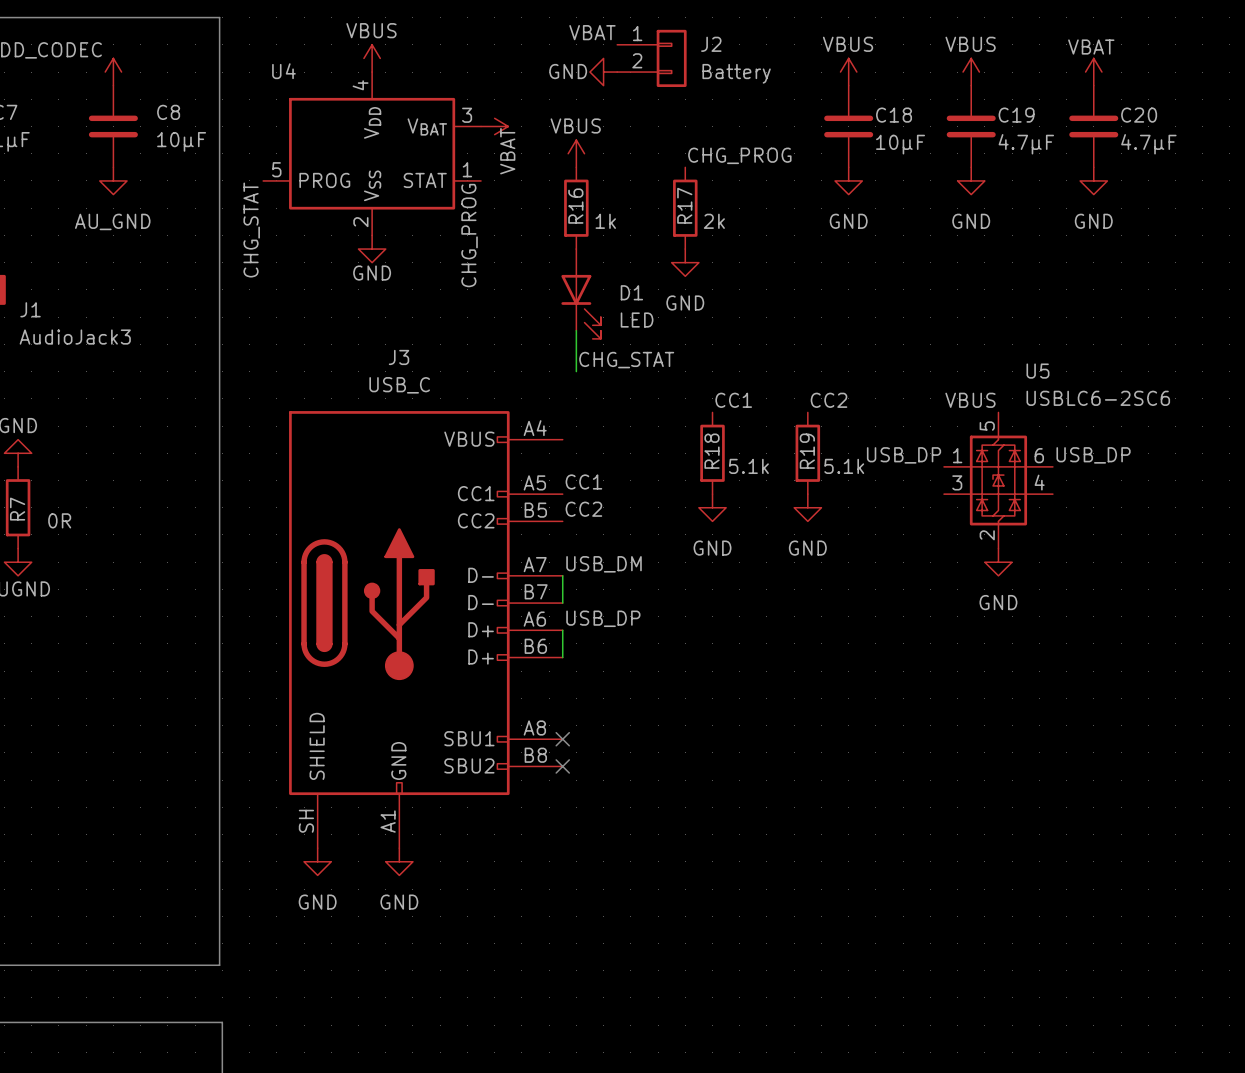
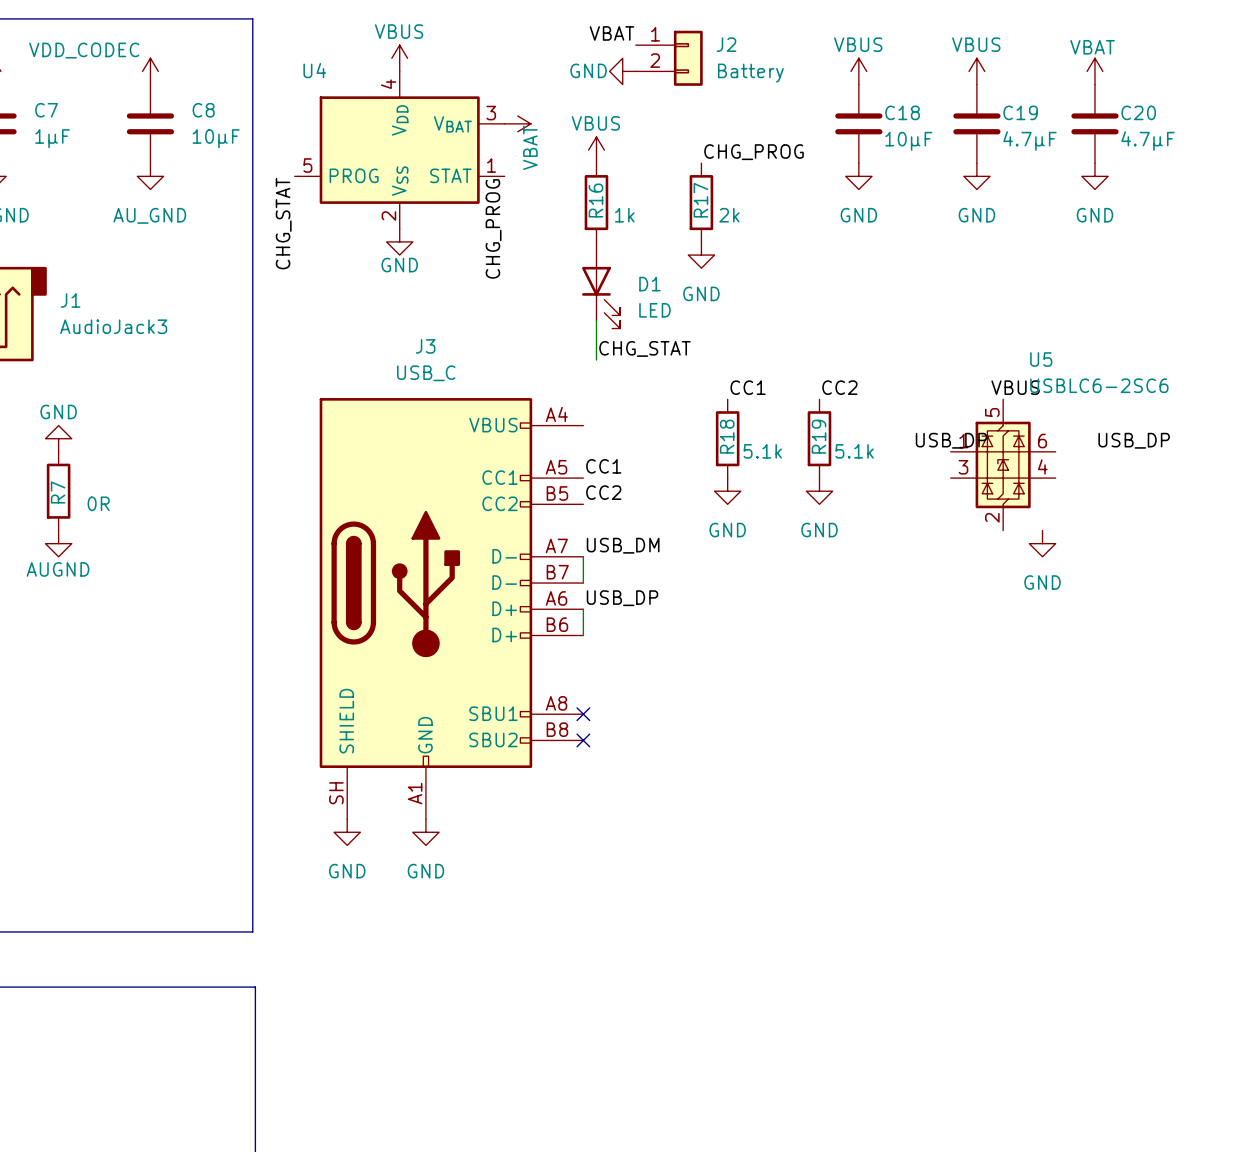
label position: VBUS (970, 400) -> VBUS (1015, 387)
label position: USB_DP (904, 455) -> USB_DP (951, 440)
label position: USB_DP (1093, 455) -> USB_DP (1134, 440)
power symbol position: GND (998, 562) -> GND (1042, 543)

